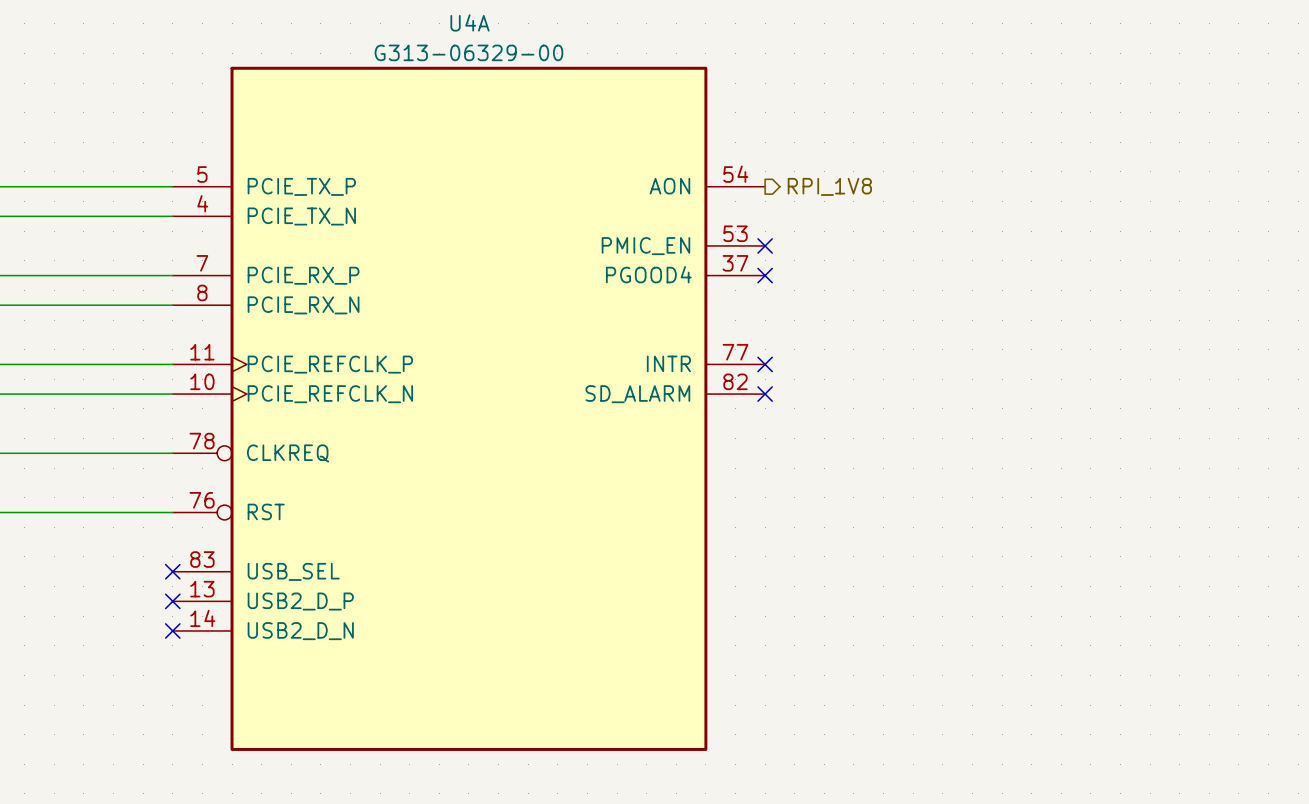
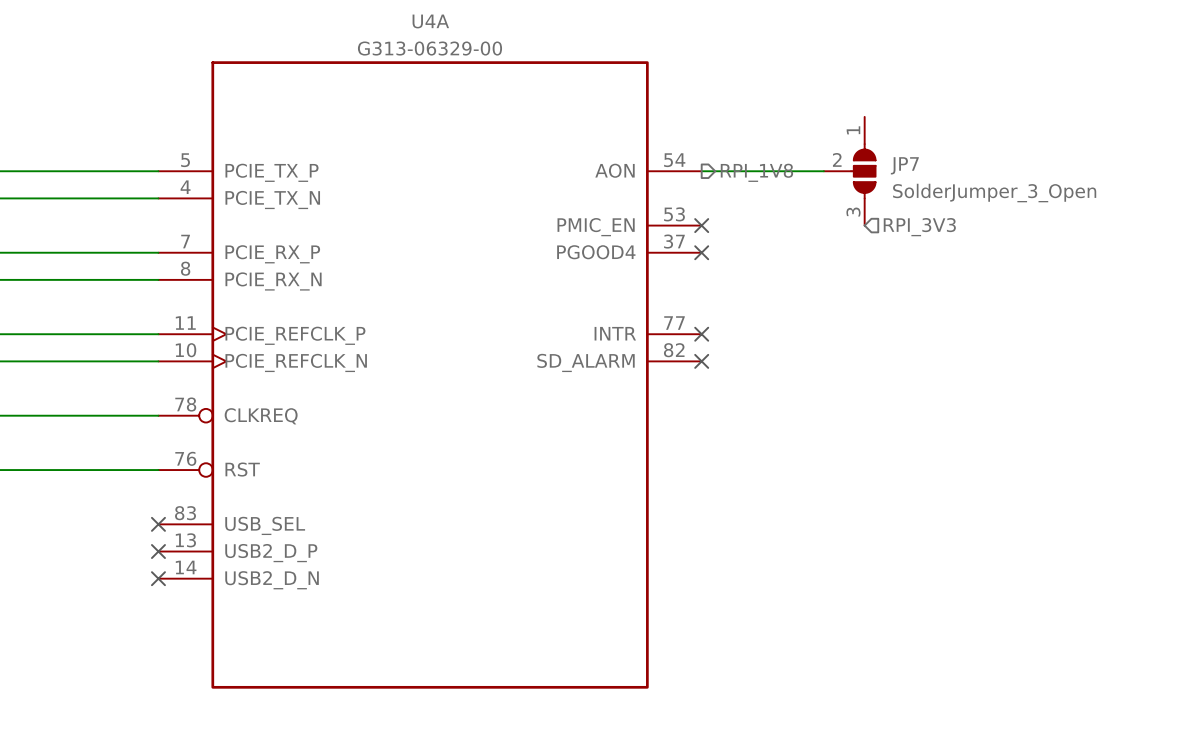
wire: none -> (701, 171) (823, 171)
JP7: none -> SolderJumper_3_Open (849, 171)
hierarchical label: none -> RPI_3V3 (919, 227)

